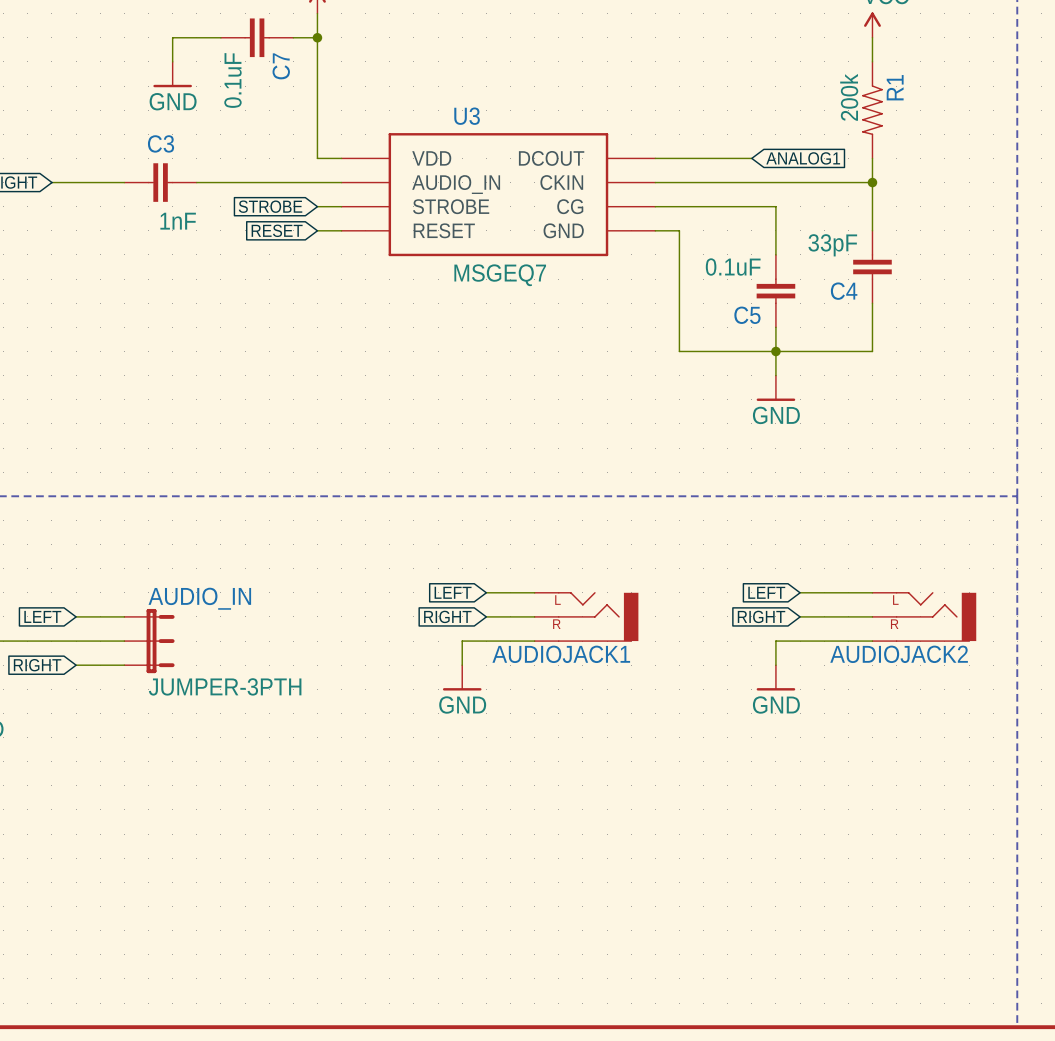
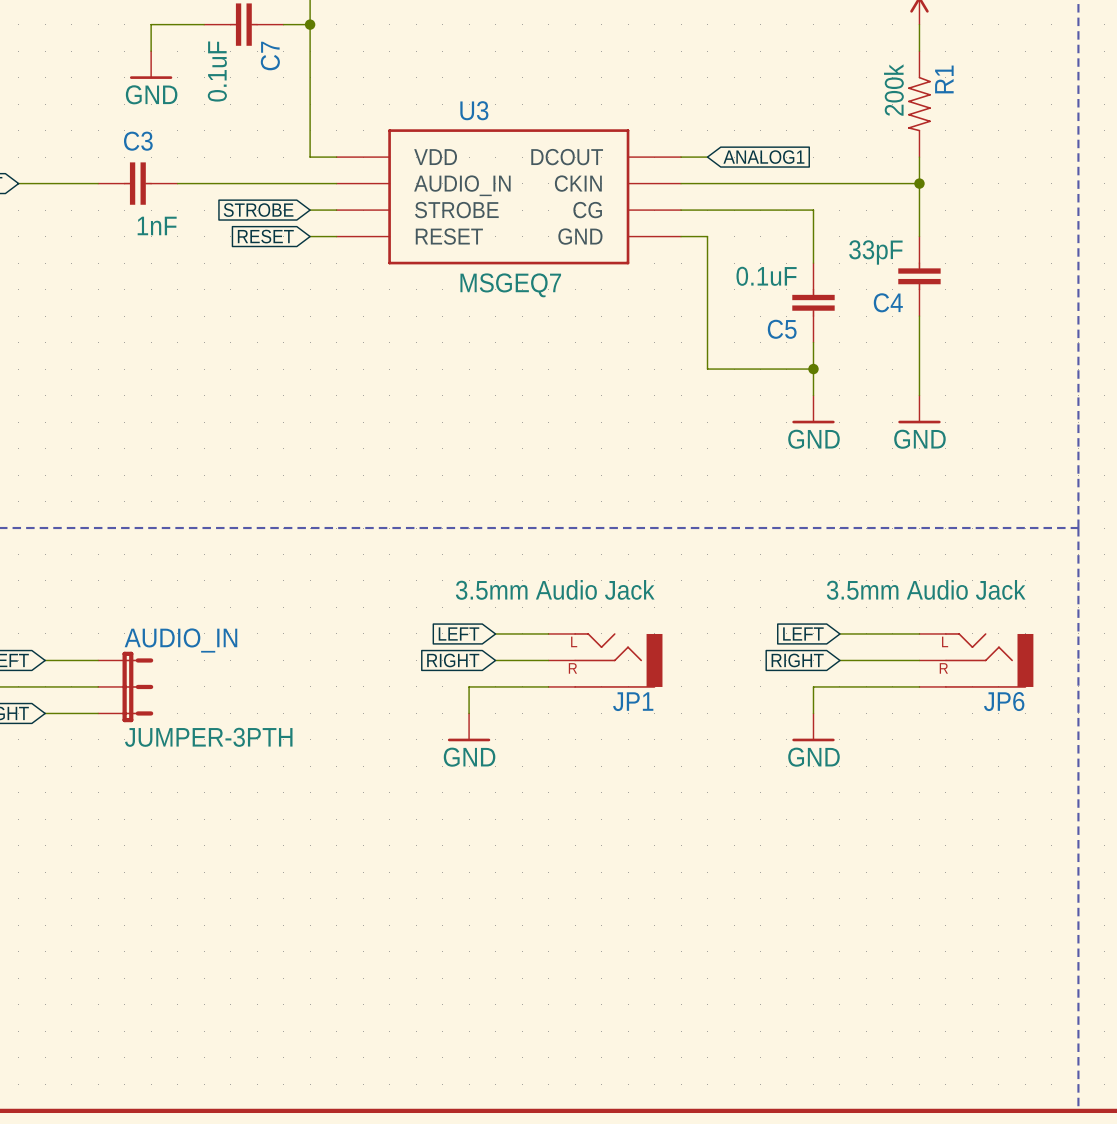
wire: (679, 158) (751, 158) -> none
global label position: ANALOG1 (803, 158) -> ANALOG1 (763, 157)
wire: (775, 351) (872, 351) -> (919, 395) (919, 369)
power symbol: none -> GND (919, 409)
AUDIOJACK1 value: none -> 3.5mm Audio Jack (555, 589)
AUDIOJACK2 value: none -> 3.5mm Audio Jack (926, 589)
AUDIOJACK1 name: AUDIOJACK1 (561, 654) -> JP1 (633, 701)
AUDIOJACK2 name: AUDIOJACK2 (899, 654) -> JP6 (1004, 701)

